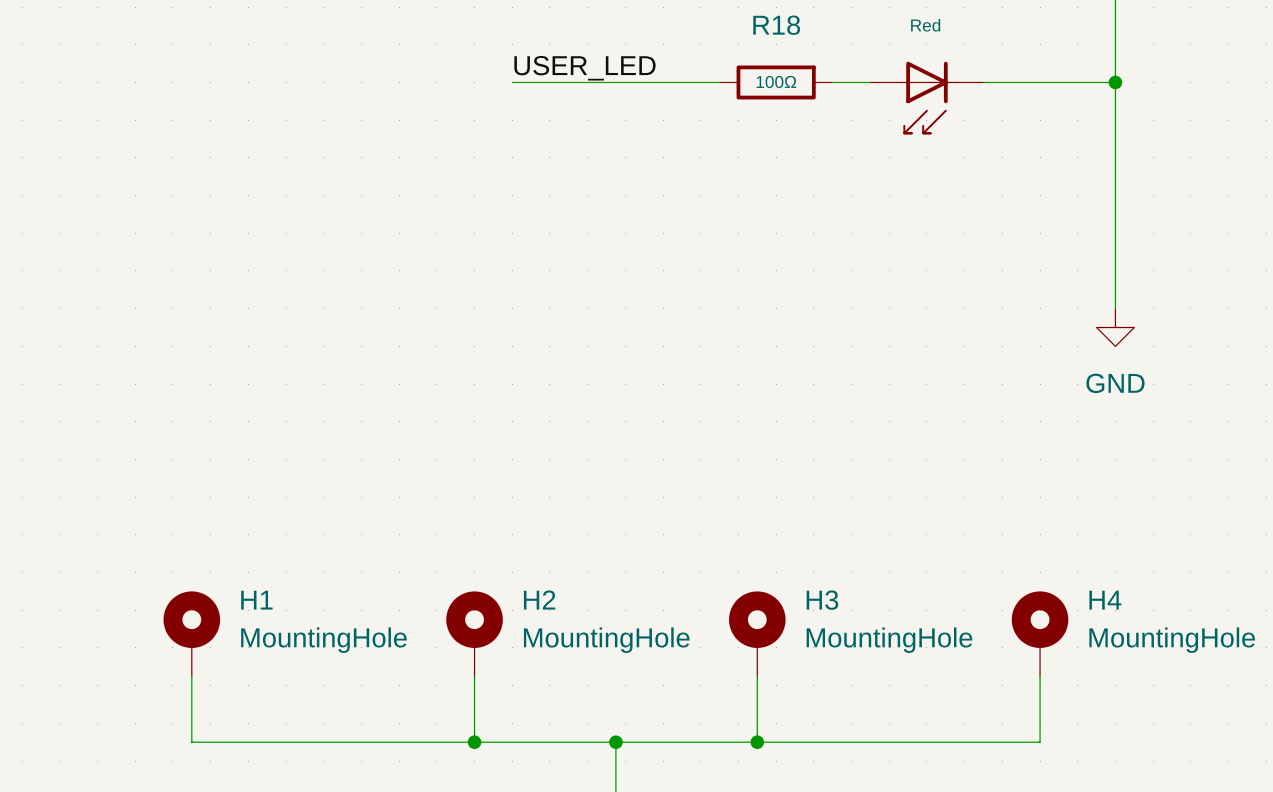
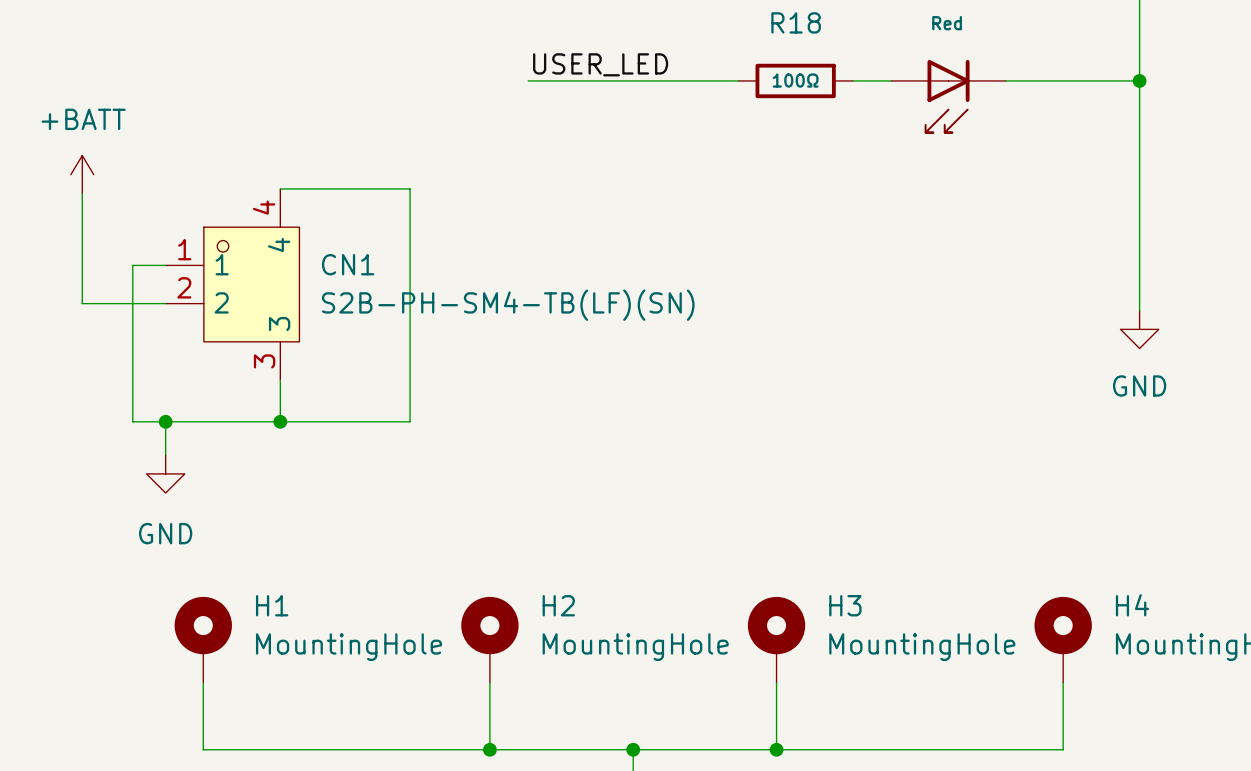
power symbol: none -> +BATT (82, 174)
wire: none -> (280, 188) (410, 188) (410, 421) (132, 421) (132, 265) (165, 265)
wire: none -> (82, 193) (82, 303) (165, 303)
CN1: none -> S2B-PH-SM4-TB(LF)(SN) (232, 284)
wire: none -> (280, 380) (280, 421)
wire: none -> (165, 421) (165, 454)
junction: none -> (165, 421)
junction: none -> (280, 421)
power symbol: none -> GND (165, 473)

